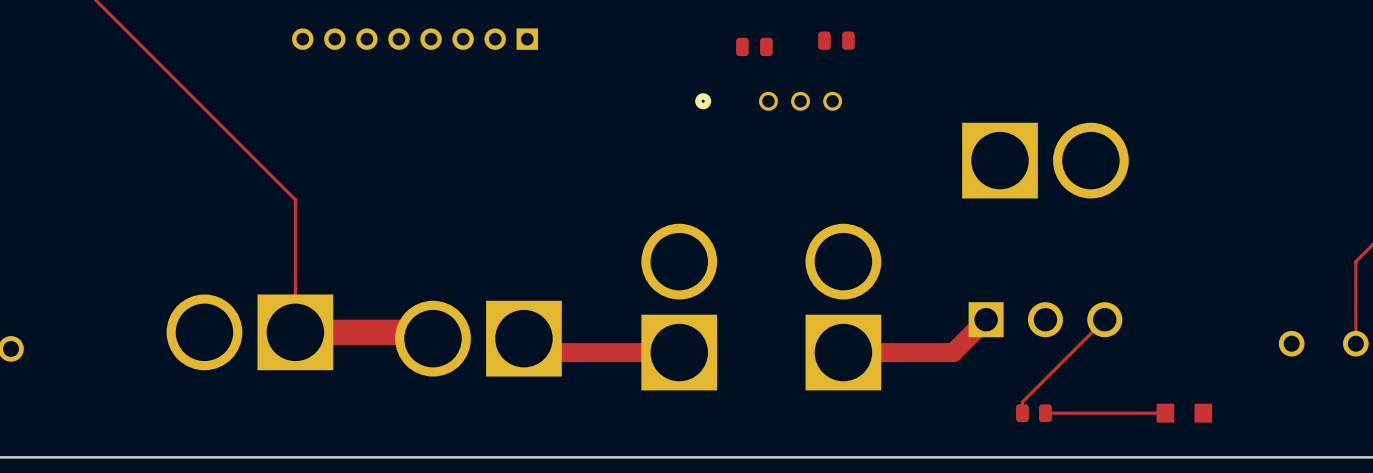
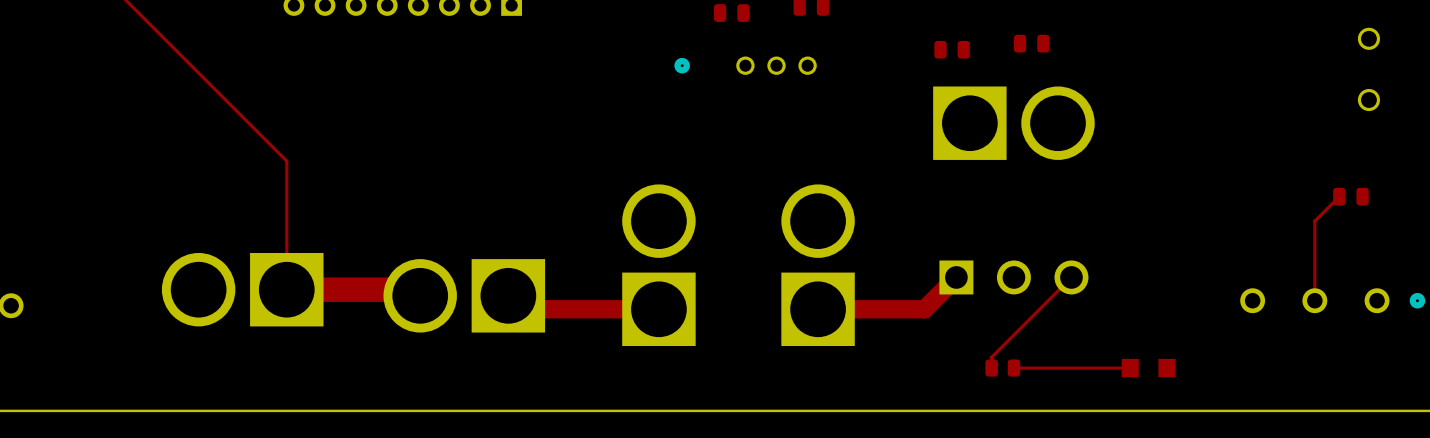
part: none -> (1031, 43)
part: none -> (952, 49)

